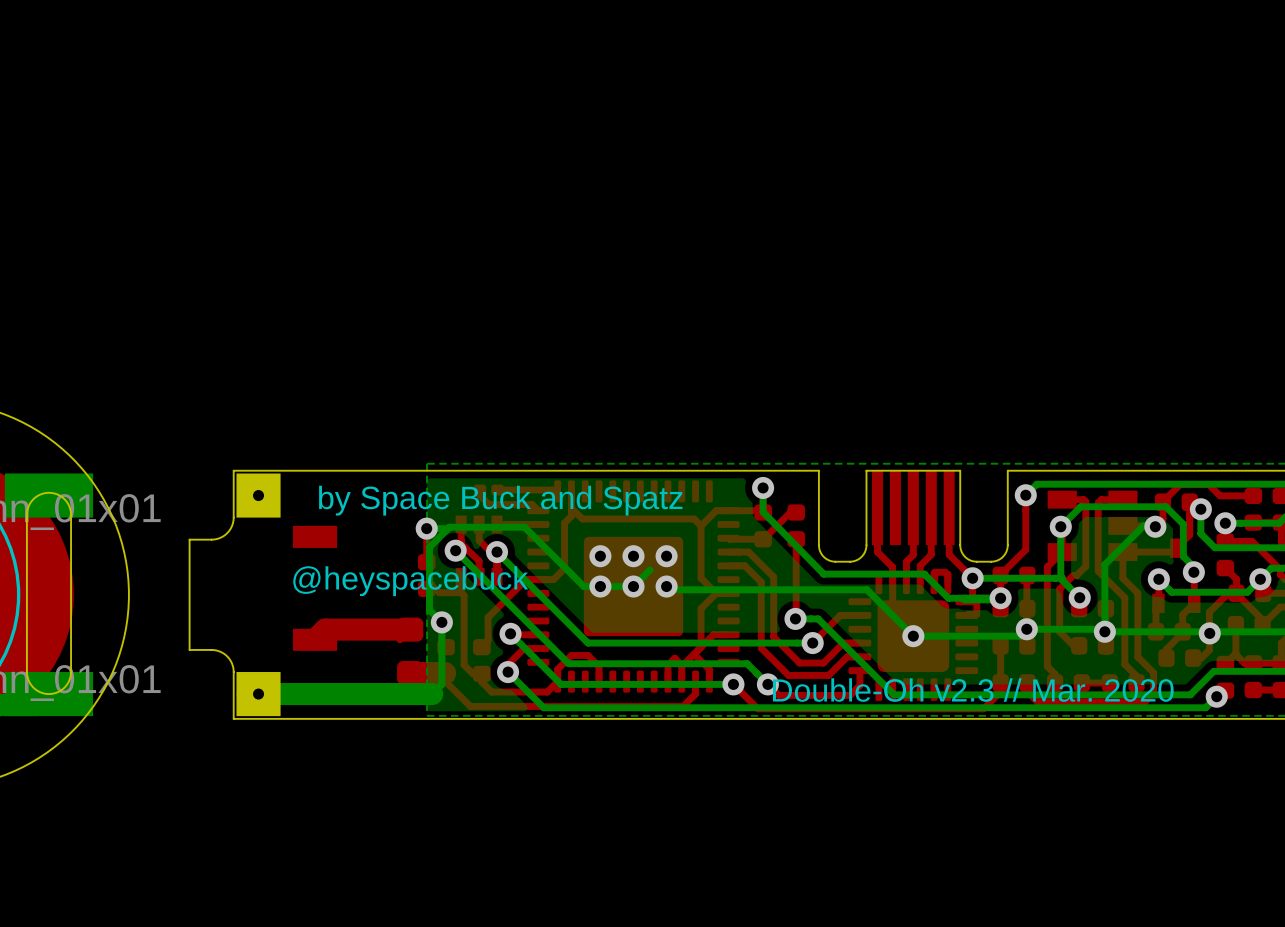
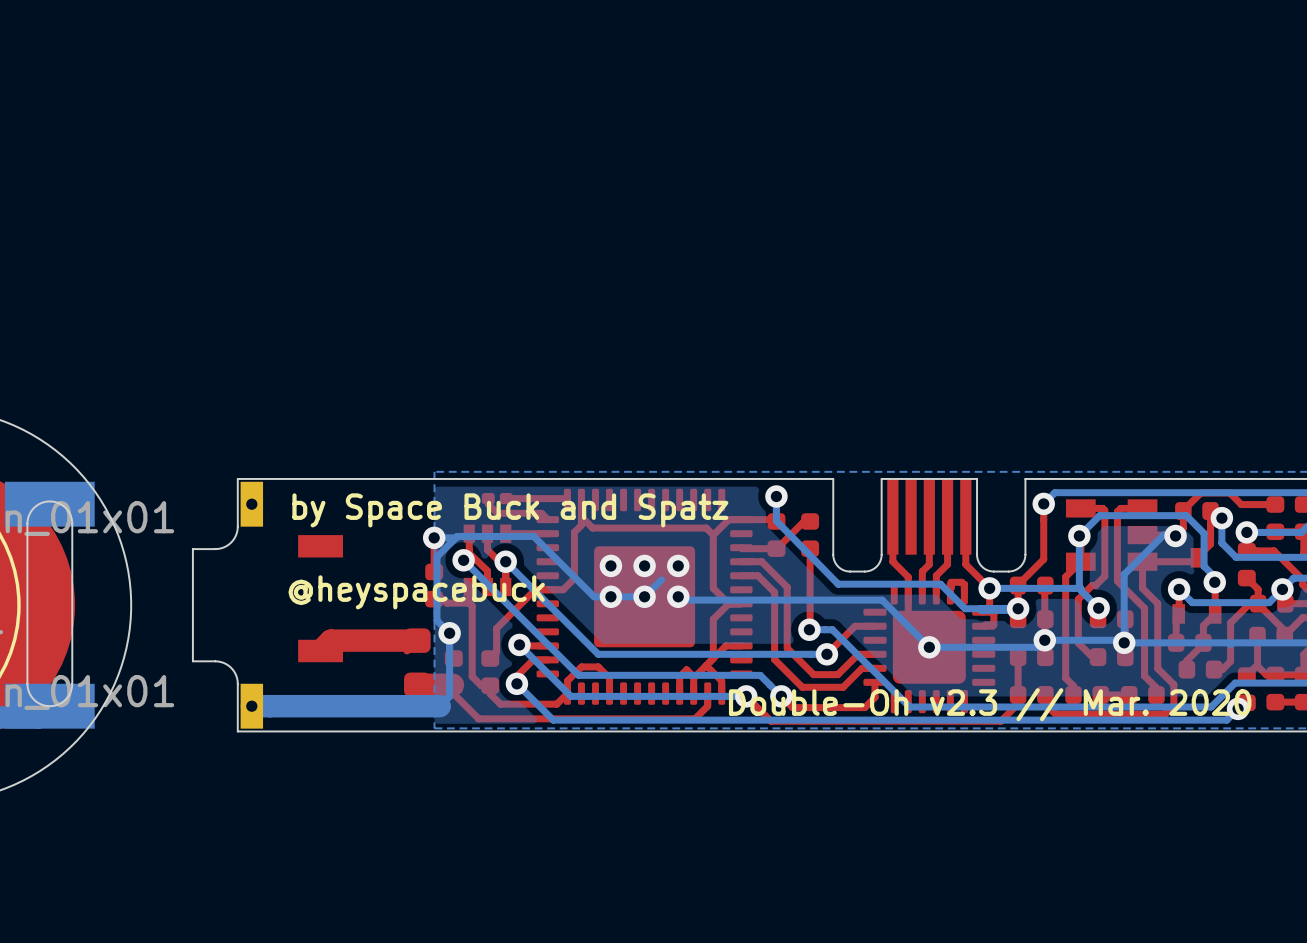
part footprint: [236, 473, 281, 518] -> [240, 481, 264, 527]
via: (1209, 633) -> none
part footprint: [236, 672, 281, 717] -> [240, 683, 264, 729]

